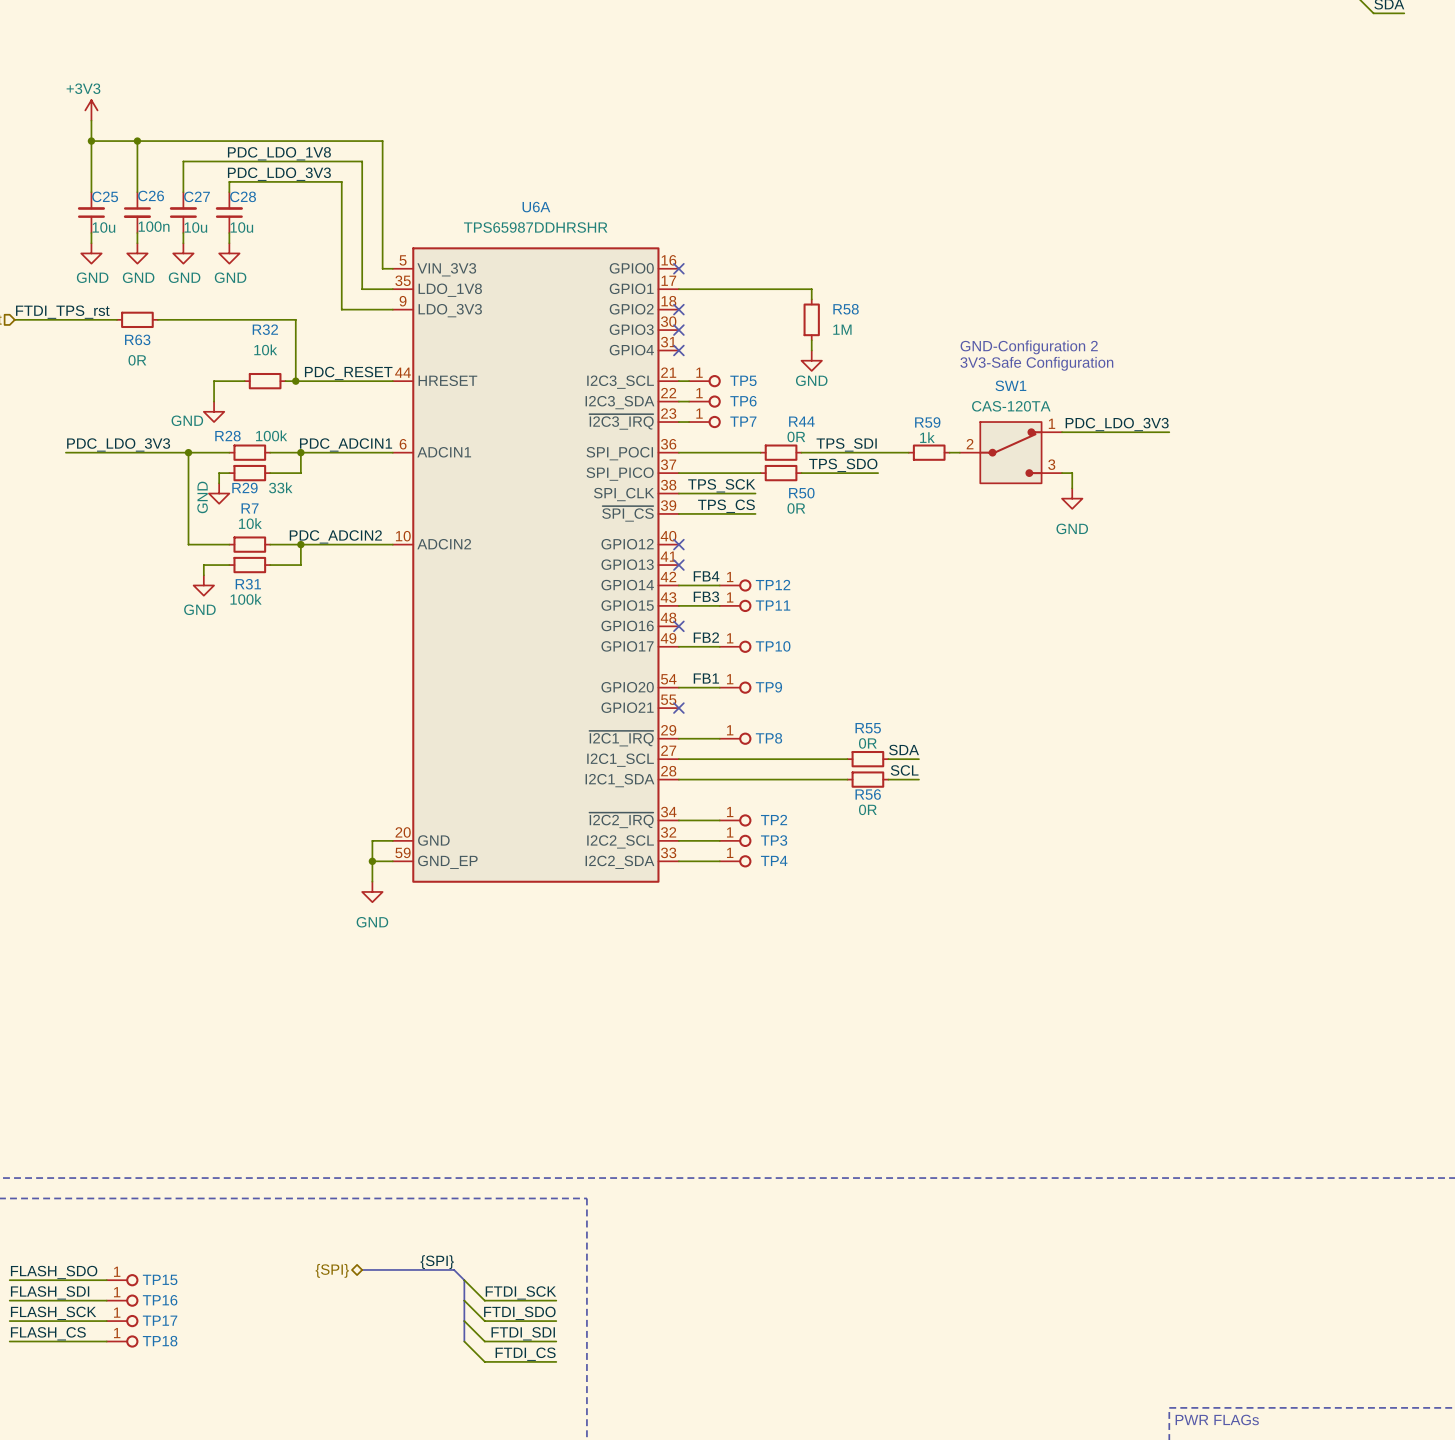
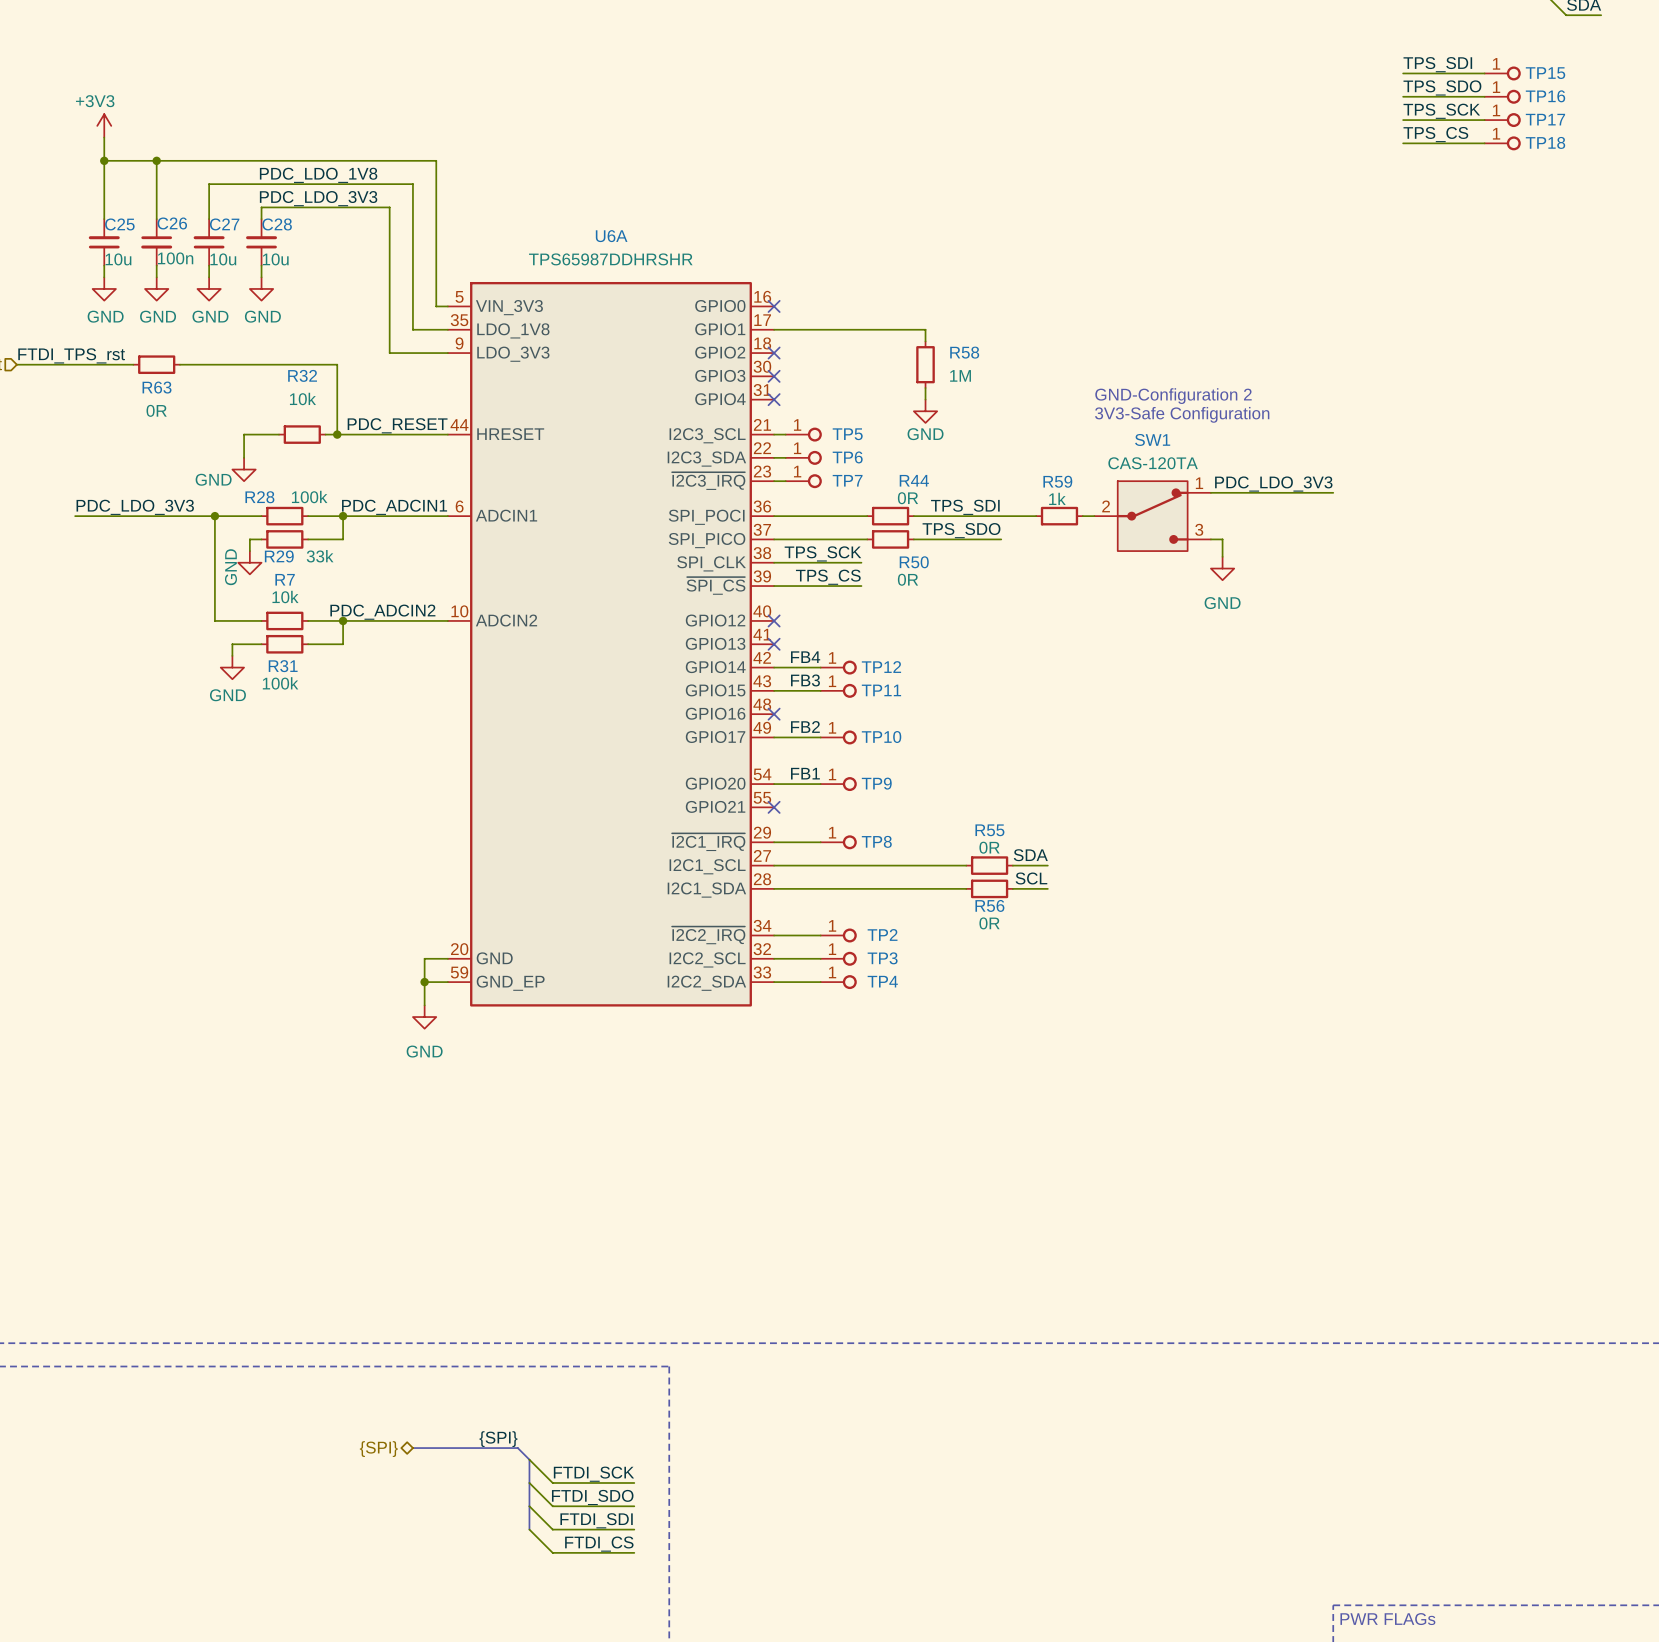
label: none -> TPS_SDI (1437, 64)
wire: none -> (1403, 73) (1484, 73)
label: none -> TPS_SDO (1442, 87)
wire: none -> (1403, 96) (1484, 96)
label: none -> TPS_SCK (1441, 111)
wire: none -> (1403, 120) (1484, 120)
label: none -> TPS_CS (1435, 134)
wire: none -> (1403, 143) (1484, 143)
label: FLASH_SDO (54, 1272) -> none
wire: (9, 1280) (106, 1280) -> none
TP15 position: (122, 1280) -> (1502, 73)
label: FLASH_SDI (50, 1292) -> none
wire: (9, 1300) (106, 1300) -> none
TP16 position: (122, 1300) -> (1502, 96)
label: FLASH_SCK (53, 1313) -> none
wire: (9, 1321) (106, 1321) -> none
TP17 position: (122, 1321) -> (1502, 120)
label: FLASH_CS (48, 1333) -> none
wire: (9, 1341) (106, 1341) -> none
TP18 position: (122, 1341) -> (1502, 143)

